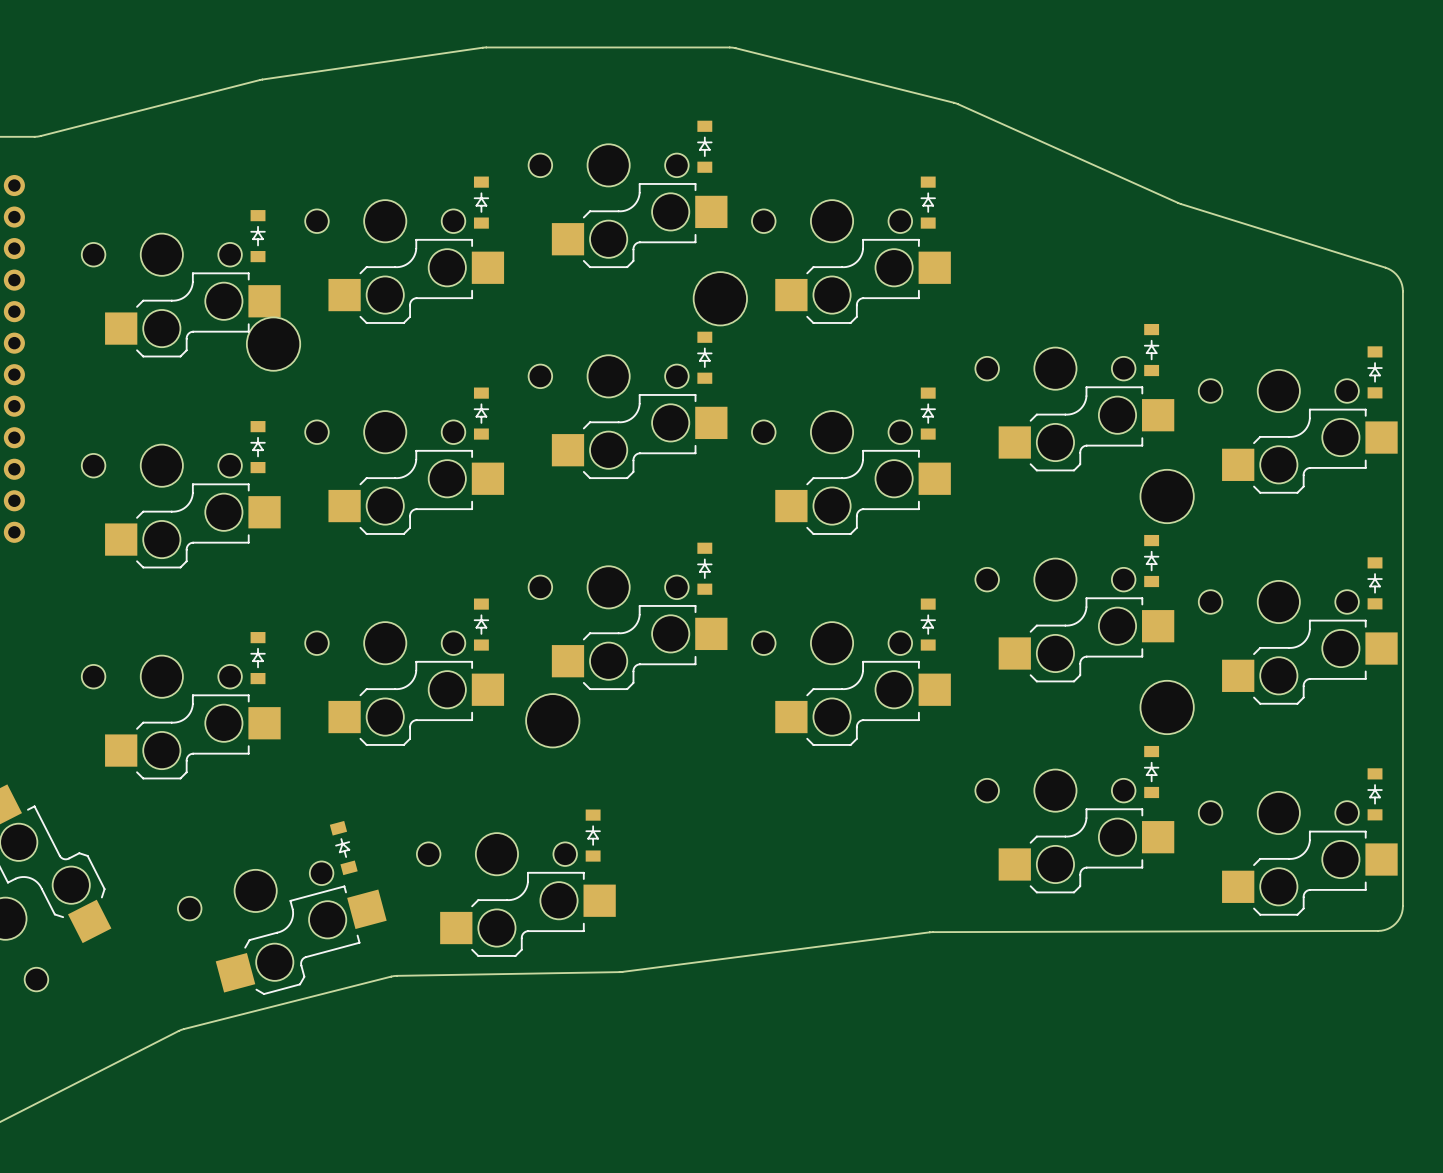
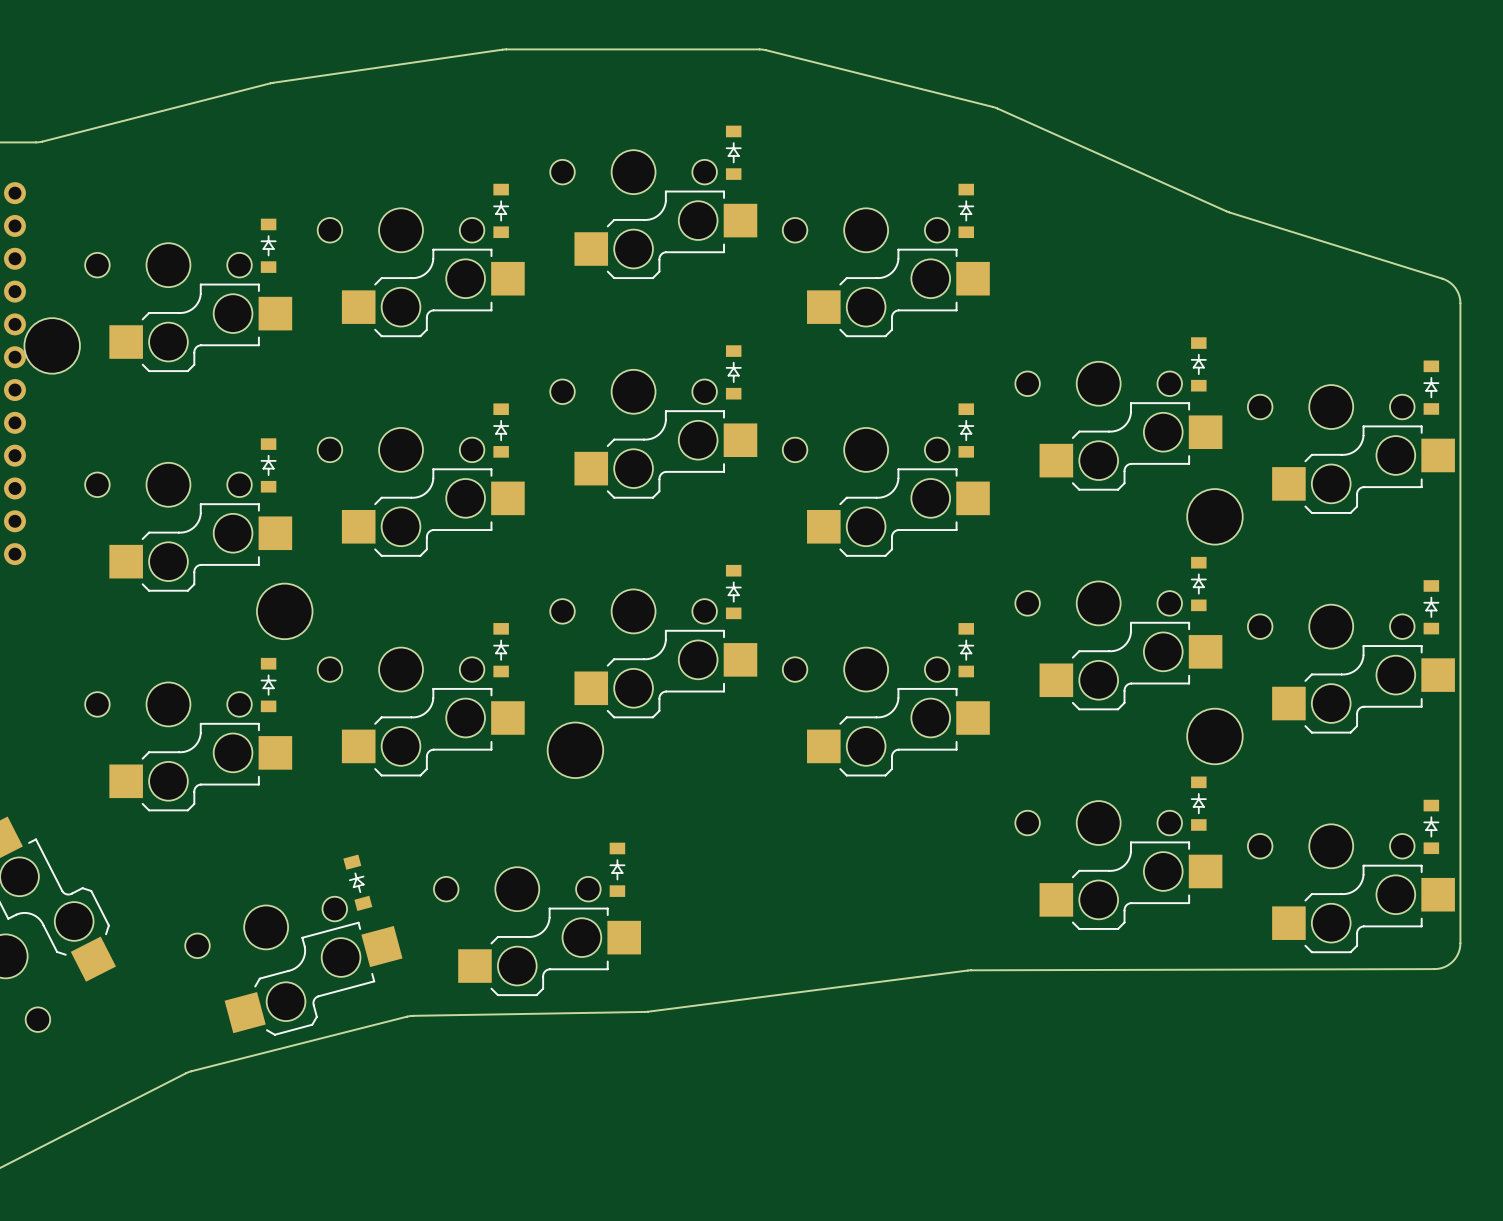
part: (720, 298) -> none
part: none -> (52, 345)
part: (273, 344) -> none
part: none -> (284, 611)

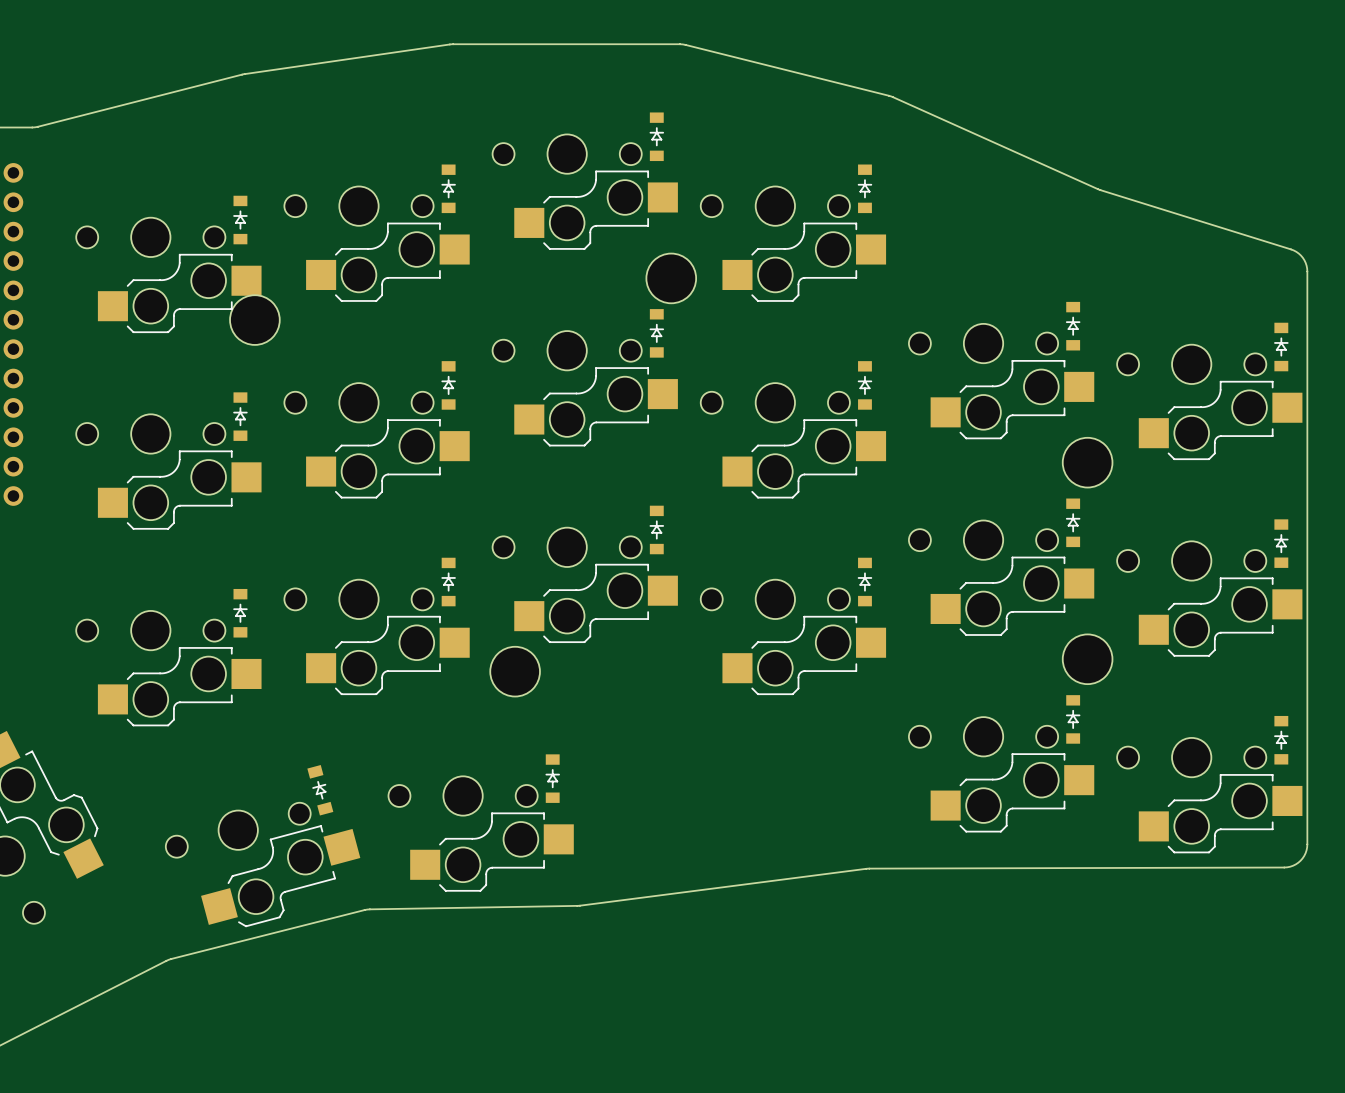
part: none -> (671, 278)
part: (52, 345) -> none
part: none -> (254, 320)
part: (284, 611) -> none

